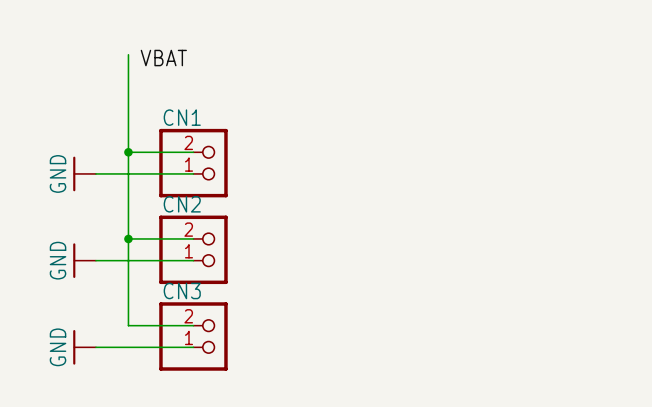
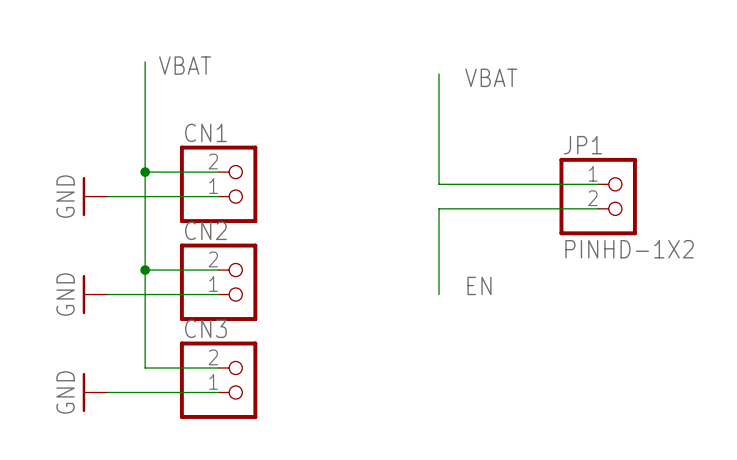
wire: none -> (439, 74) (439, 184) (598, 184)
label: none -> VBAT (491, 77)
JP1: none -> PINHD-1X2 (598, 196)
wire: none -> (598, 208) (439, 208) (439, 294)
label: none -> EN (479, 285)

